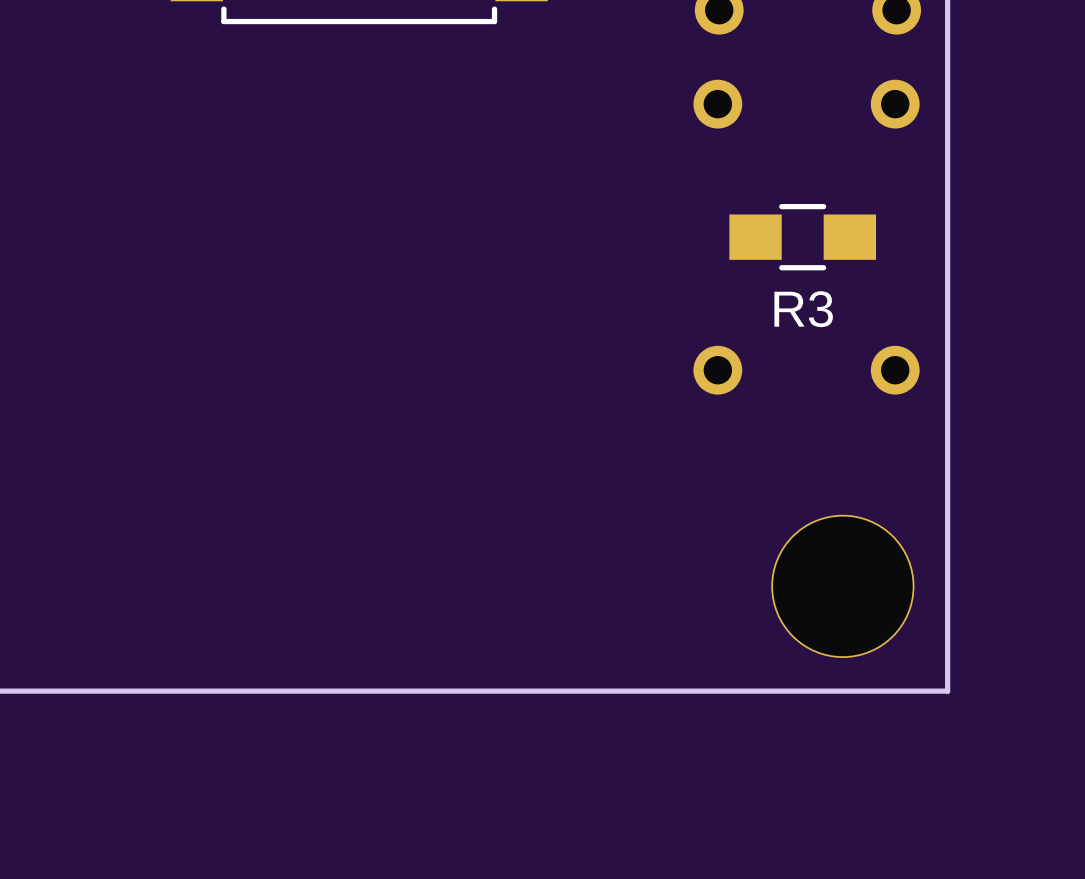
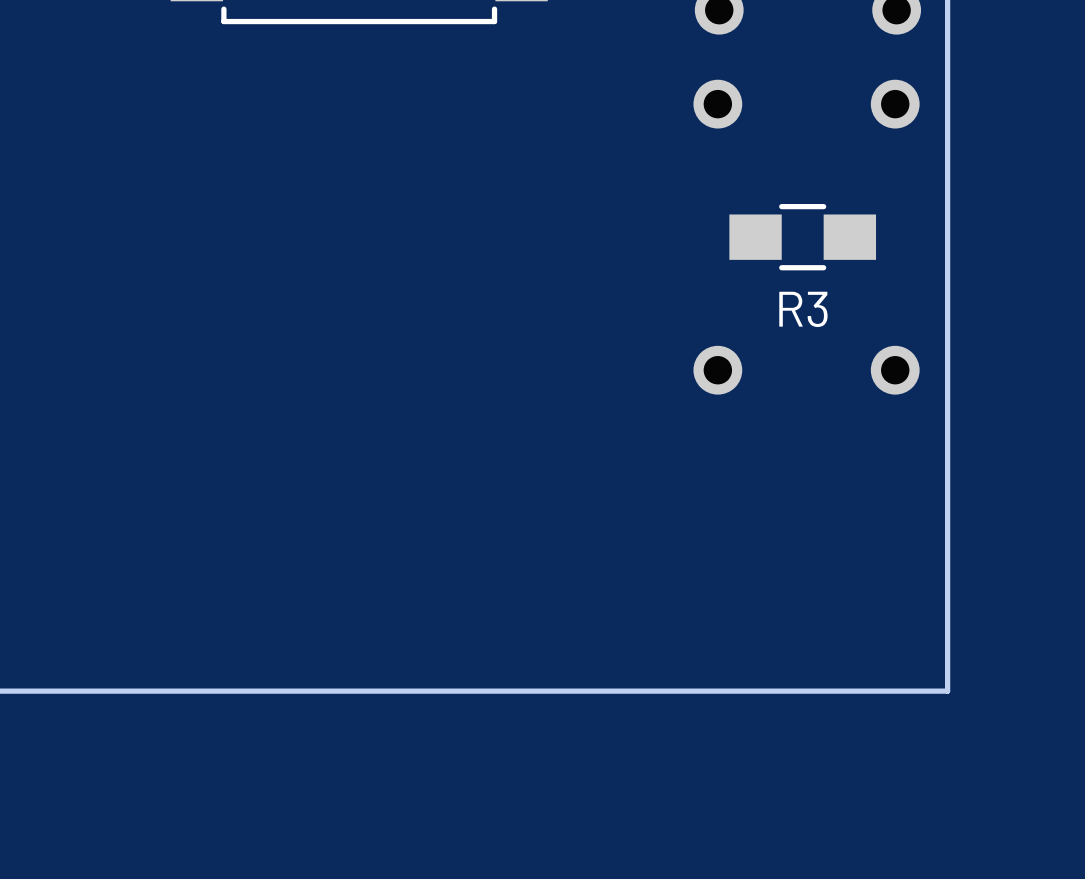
part: (842, 586) -> none

